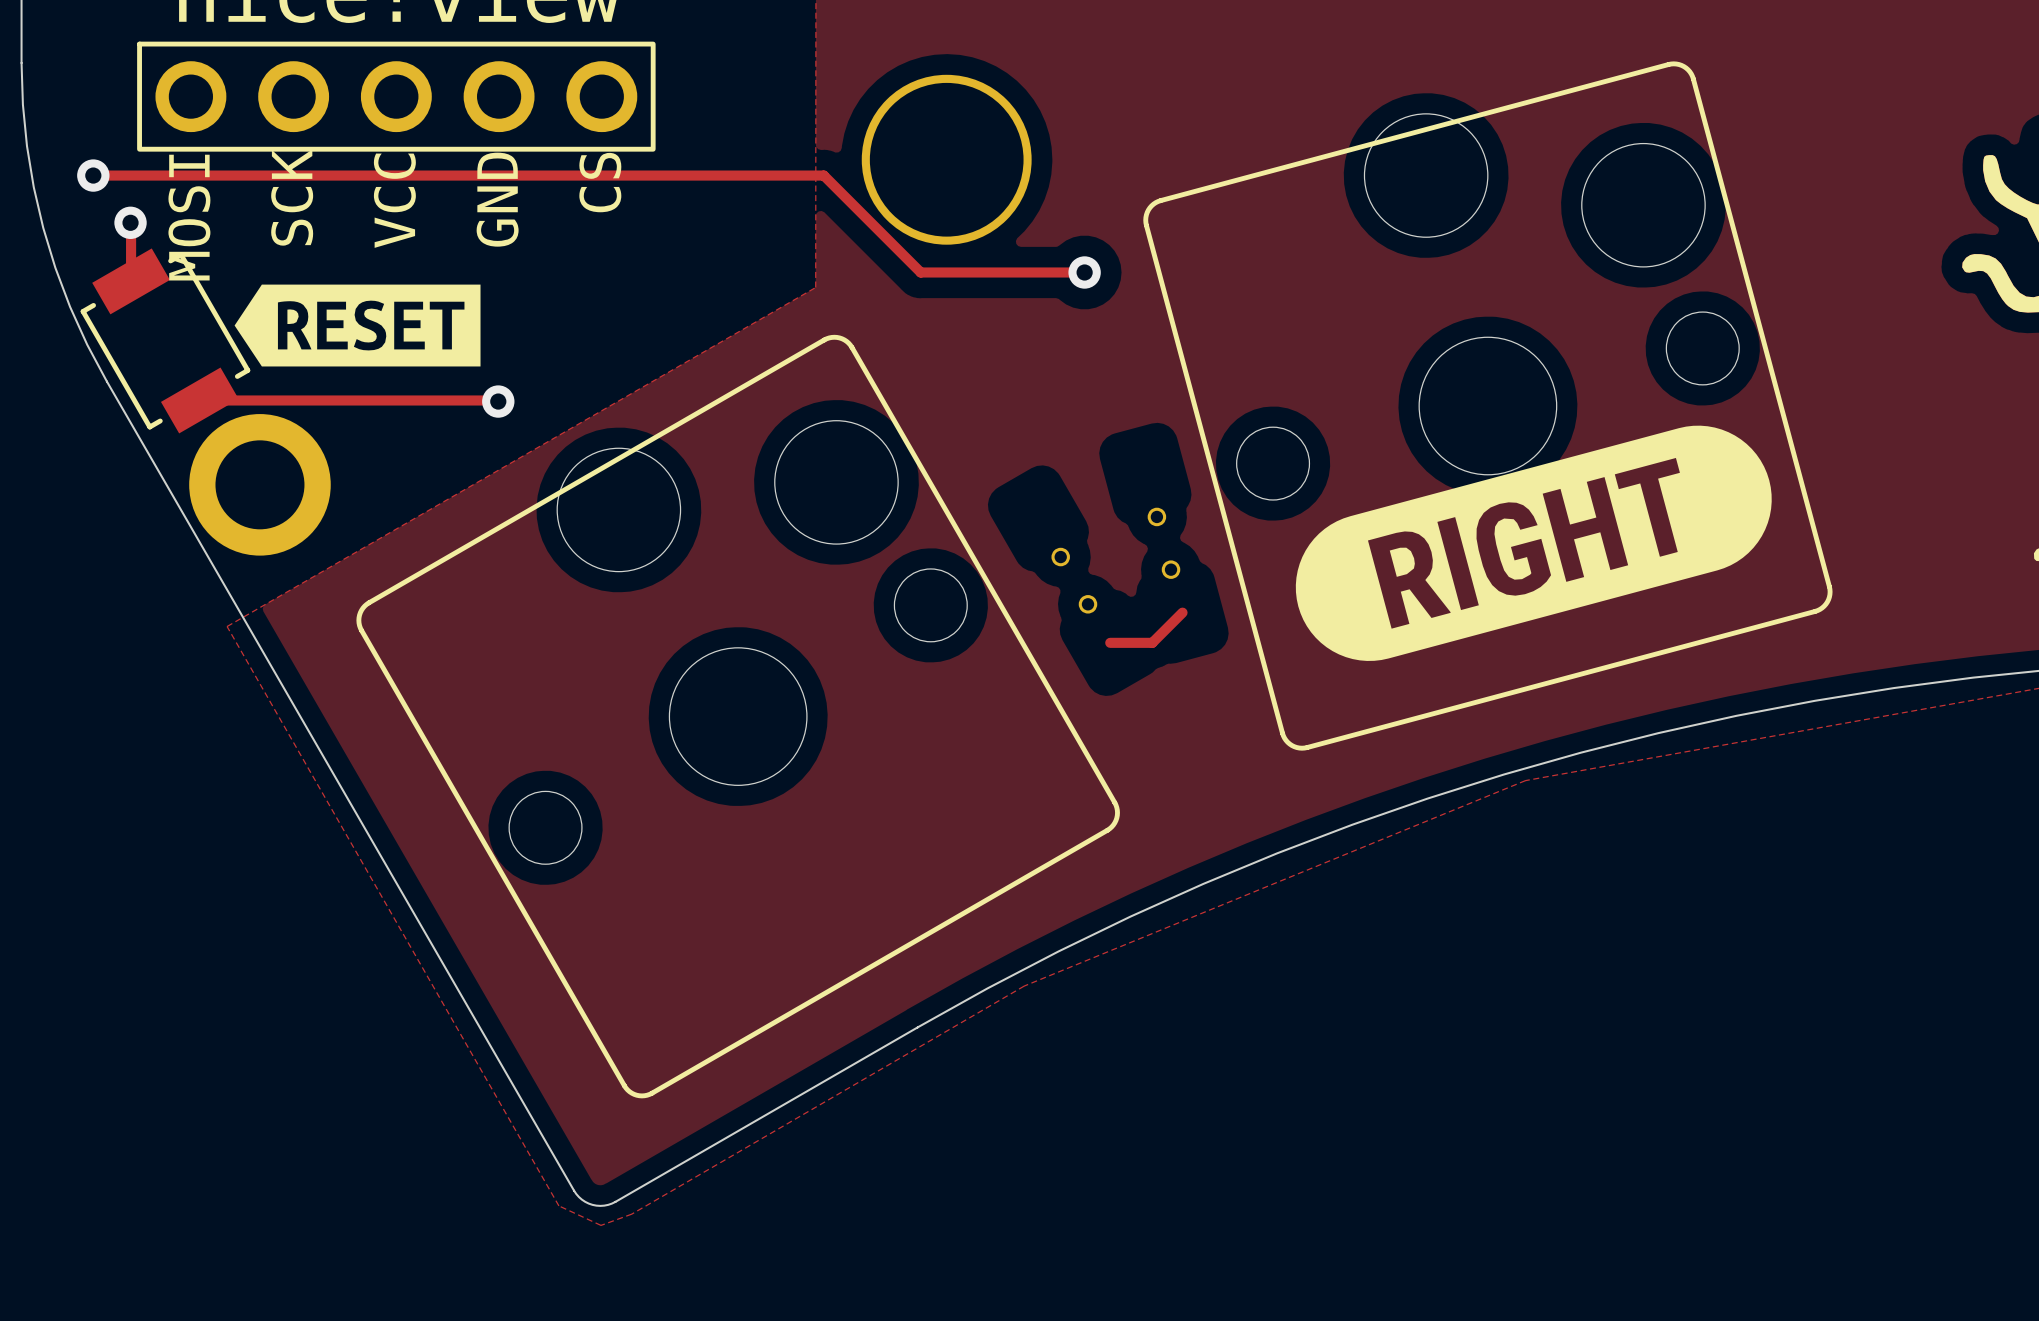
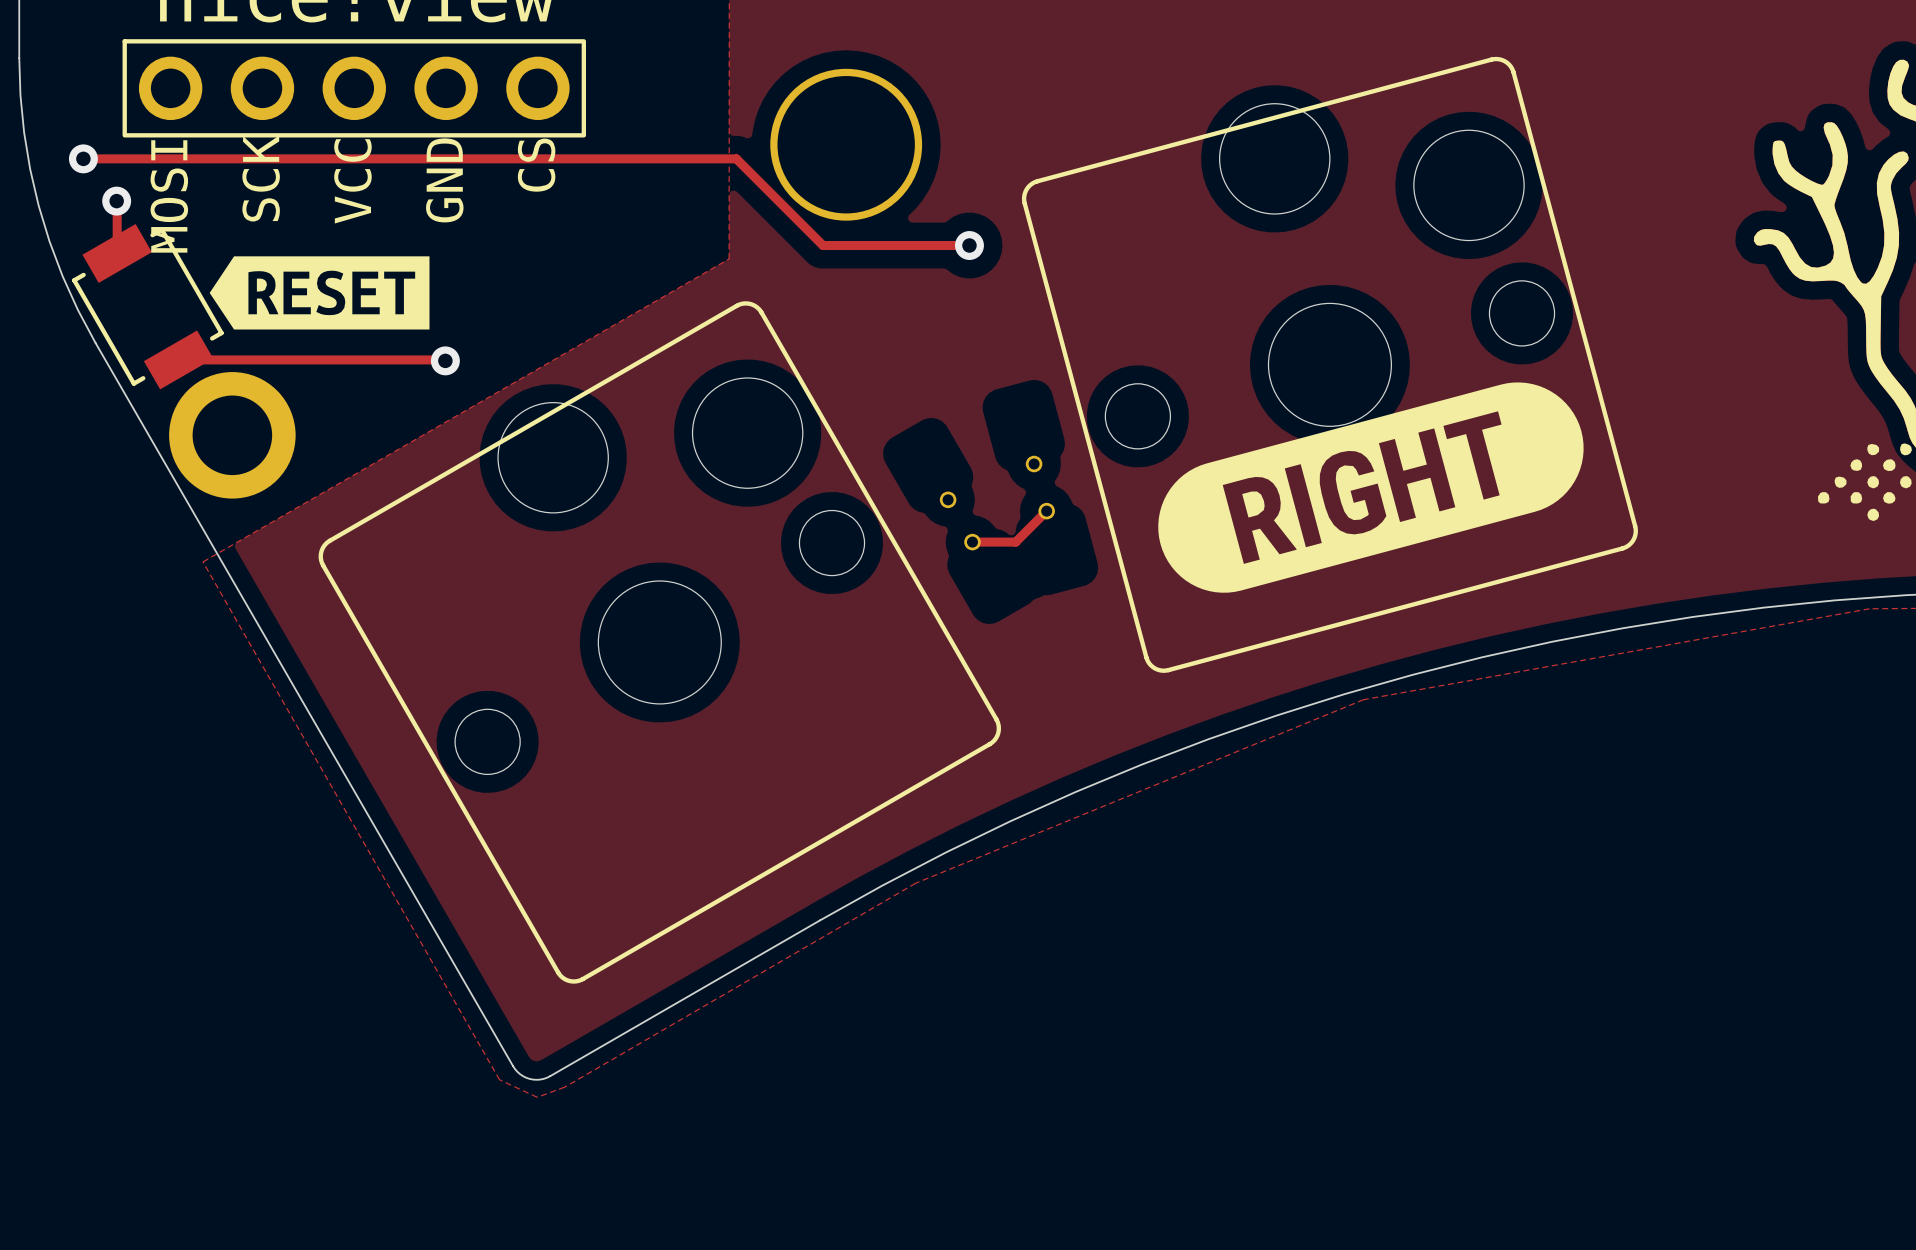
track: none -> (1046, 511) (1015, 542) (972, 542)
track: (1182, 612) (1152, 642) (1110, 642) -> none

